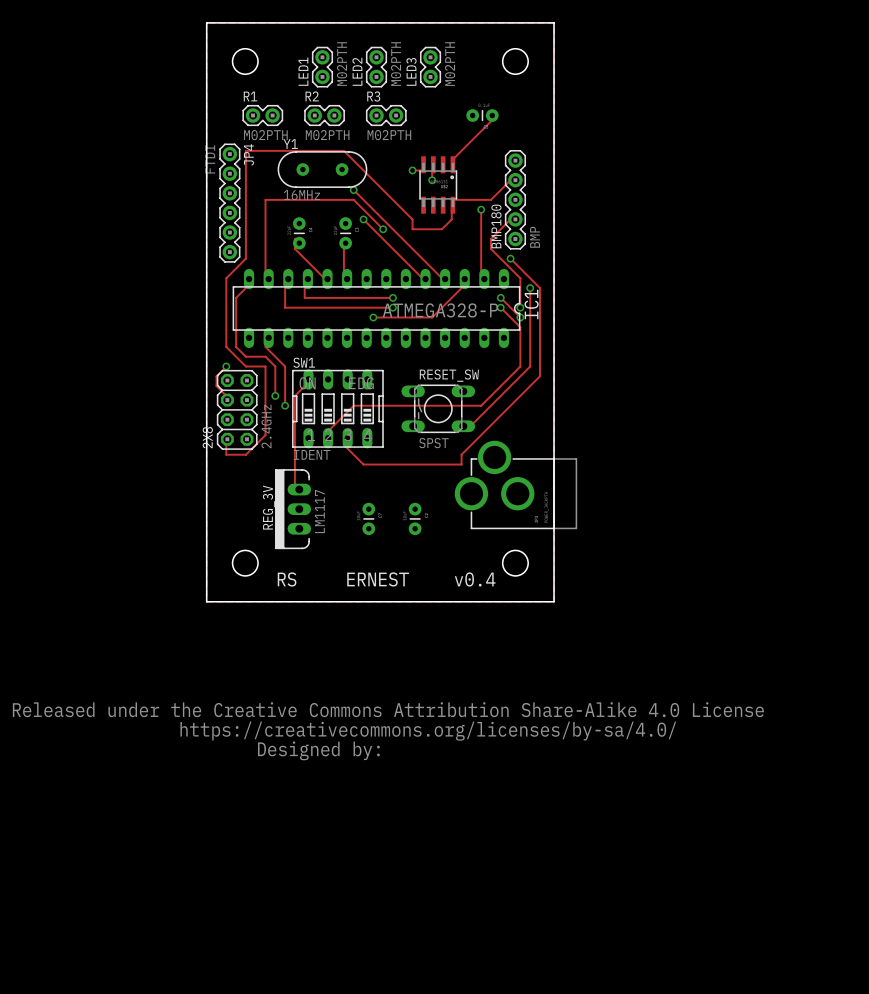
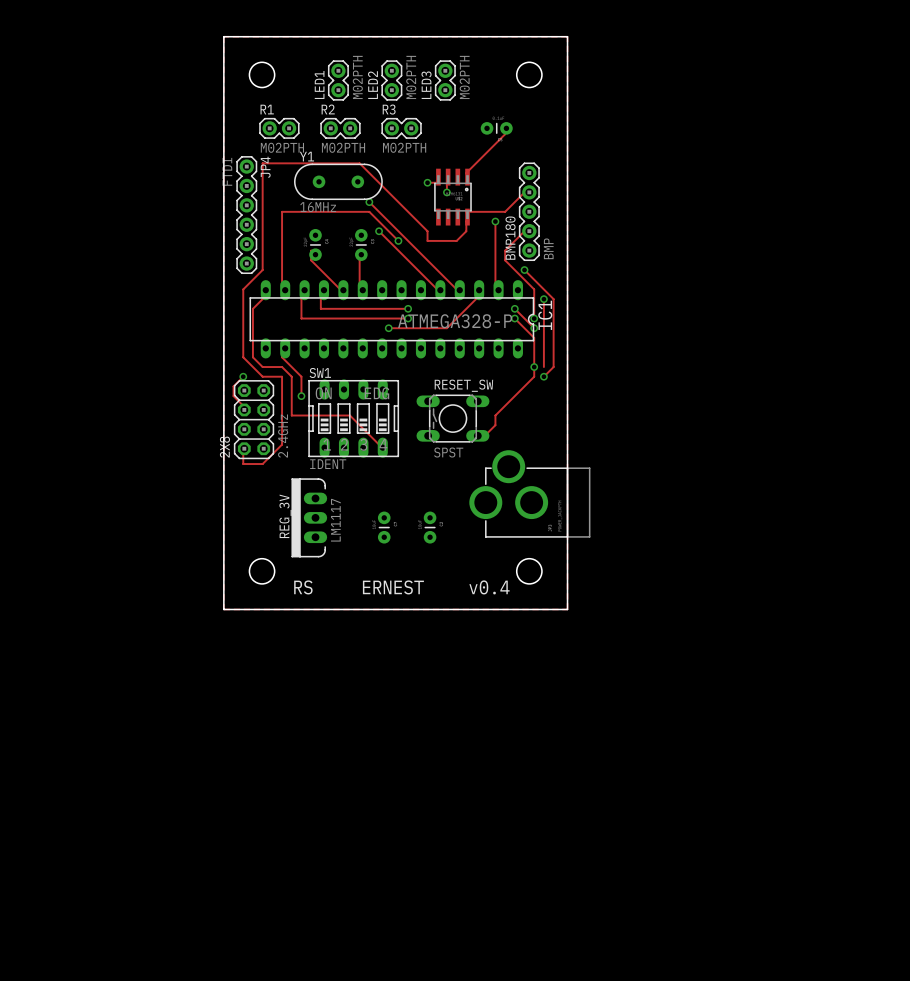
via: none -> (534, 367)
track: (530, 356) (530, 366) (481, 415) -> (495, 415) (495, 425)
track: (539, 356) (539, 376) (461, 454) (461, 464) (363, 464) (343, 444) (347, 438) -> (553, 367) (543, 376)
via: none -> (543, 376)
track: (308, 379) (294, 395) (294, 484) (299, 489) -> none
track: (285, 386) (285, 405) -> none
via: none -> (301, 396)
track: none -> (291, 405) (291, 415) (349, 415) (382, 447)
via: (275, 395) -> none
via: (285, 405) -> none
track: (481, 405) (353, 405) (324, 435) (328, 438) -> none
drawing: [12, 702, 764, 761] -> none

